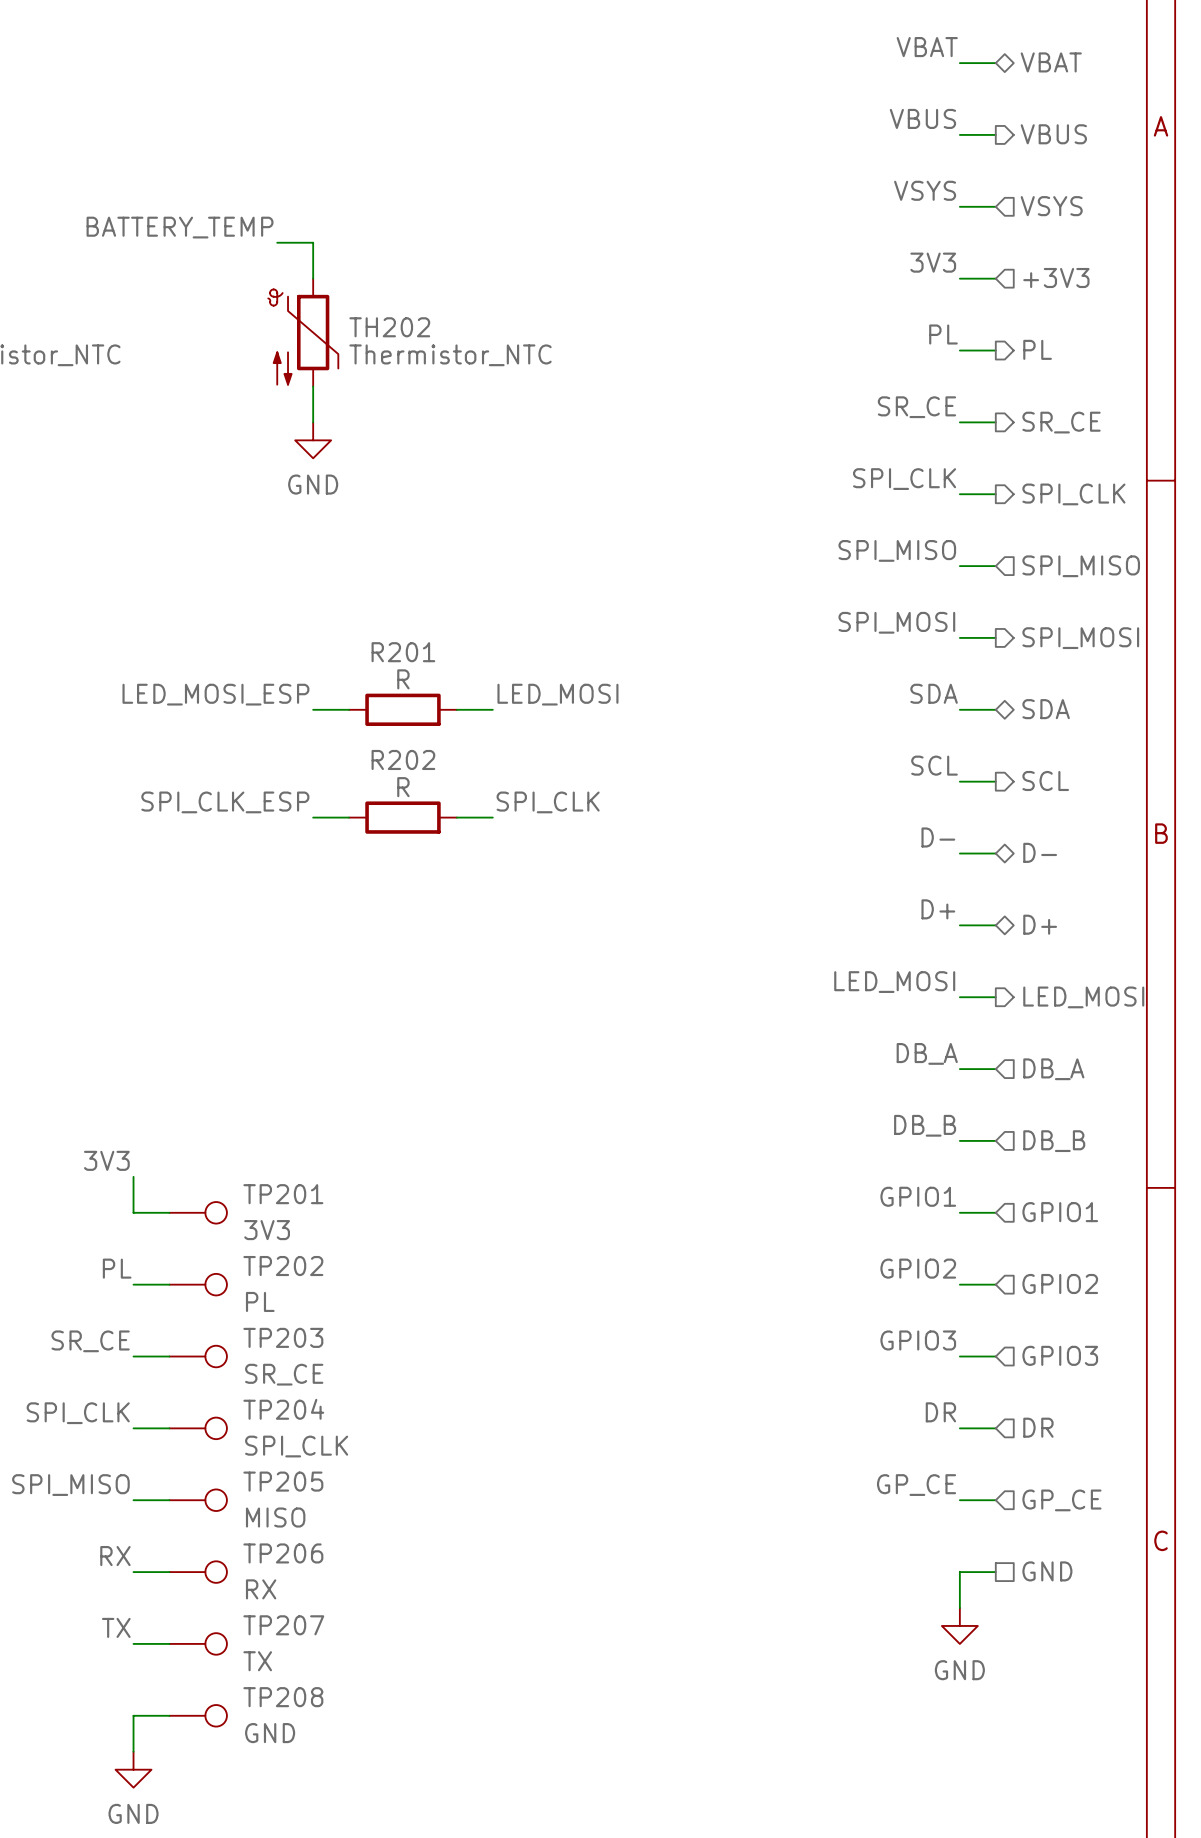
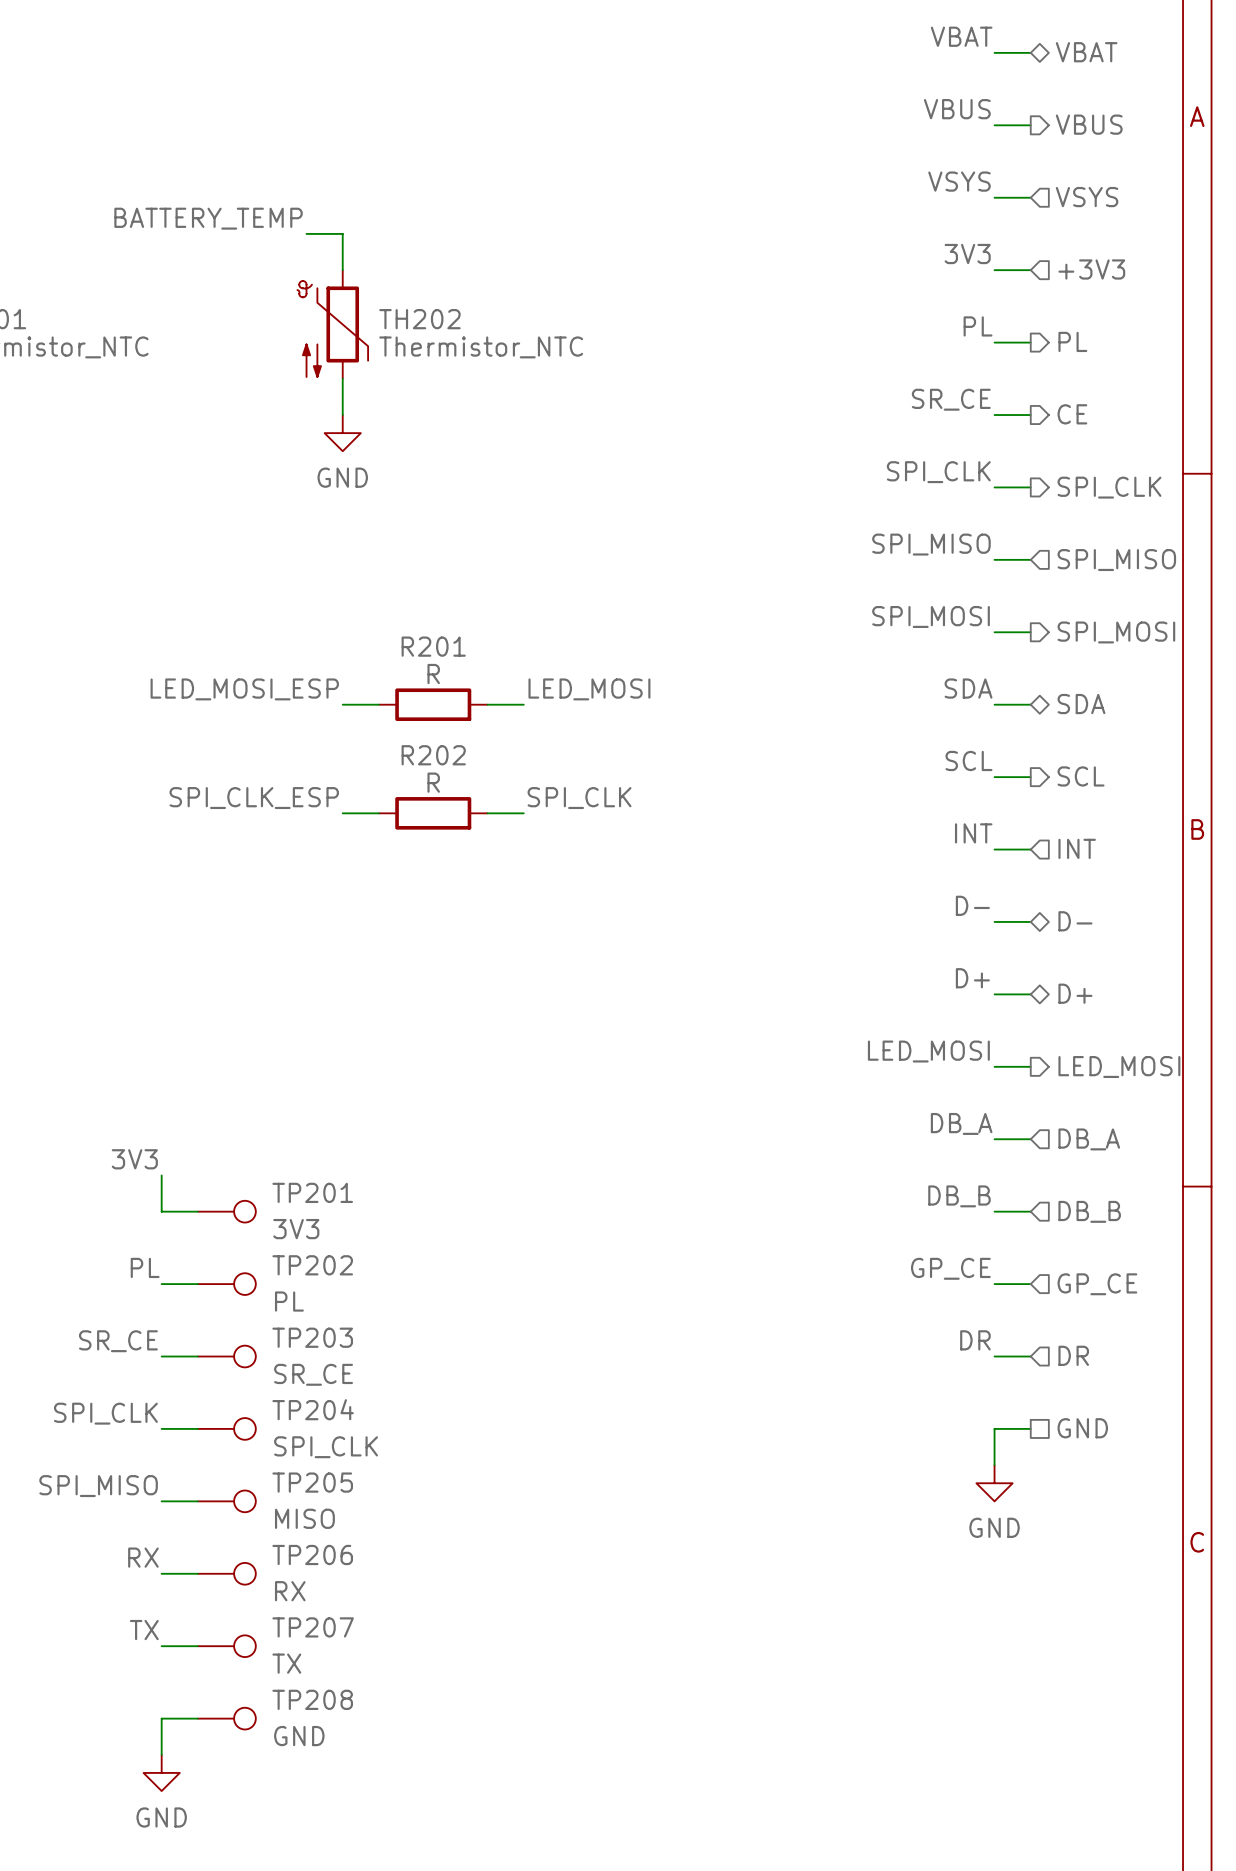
hierarchical label: SR_CE (1061, 422) -> CE (1072, 414)
label: D- (938, 837) -> INT (973, 833)
hierarchical label shape: bidirectional (1040, 852) -> input (1077, 848)
hierarchical label: D- (1040, 852) -> INT (1077, 848)
label: D+ (938, 909) -> D- (972, 905)
hierarchical label: D+ (1040, 924) -> D- (1075, 921)
label: LED_MOSI (894, 982) -> D+ (972, 978)
hierarchical label shape: output (1083, 997) -> bidirectional (1075, 993)
hierarchical label: LED_MOSI (1083, 997) -> D+ (1075, 993)
label: DB_A (927, 1053) -> LED_MOSI (928, 1051)
hierarchical label shape: input (1053, 1069) -> output (1119, 1067)
hierarchical label: DB_A (1053, 1069) -> LED_MOSI (1119, 1067)
label: DB_B (925, 1125) -> DB_A (961, 1123)
hierarchical label: DB_B (1054, 1141) -> DB_A (1089, 1139)
label: GPIO1 (918, 1196) -> DB_B (959, 1196)
hierarchical label: GPIO1 (1060, 1212) -> DB_B (1089, 1211)
label: GPIO2 (918, 1268) -> GP_CE (950, 1268)
hierarchical label: GPIO2 (1060, 1283) -> GP_CE (1097, 1284)
label: GPIO3 (918, 1340) -> DR (975, 1340)
hierarchical label: GPIO3 (1060, 1355) -> DR (1073, 1355)
label: DR (940, 1412) -> none
hierarchical label shape: input (1038, 1427) -> passive (1082, 1428)
hierarchical label: DR (1038, 1427) -> GND (1082, 1428)
wire: none -> (994, 1428) (994, 1465)
label: GP_CE (916, 1485) -> none
wire: (959, 1500) (995, 1500) -> none
hierarchical label: GP_CE (1061, 1500) -> none
hierarchical label: GND (1047, 1571) -> none
wire: (995, 1572) (959, 1572) (959, 1608) -> none
power symbol position: GND (959, 1625) -> GND (994, 1483)

